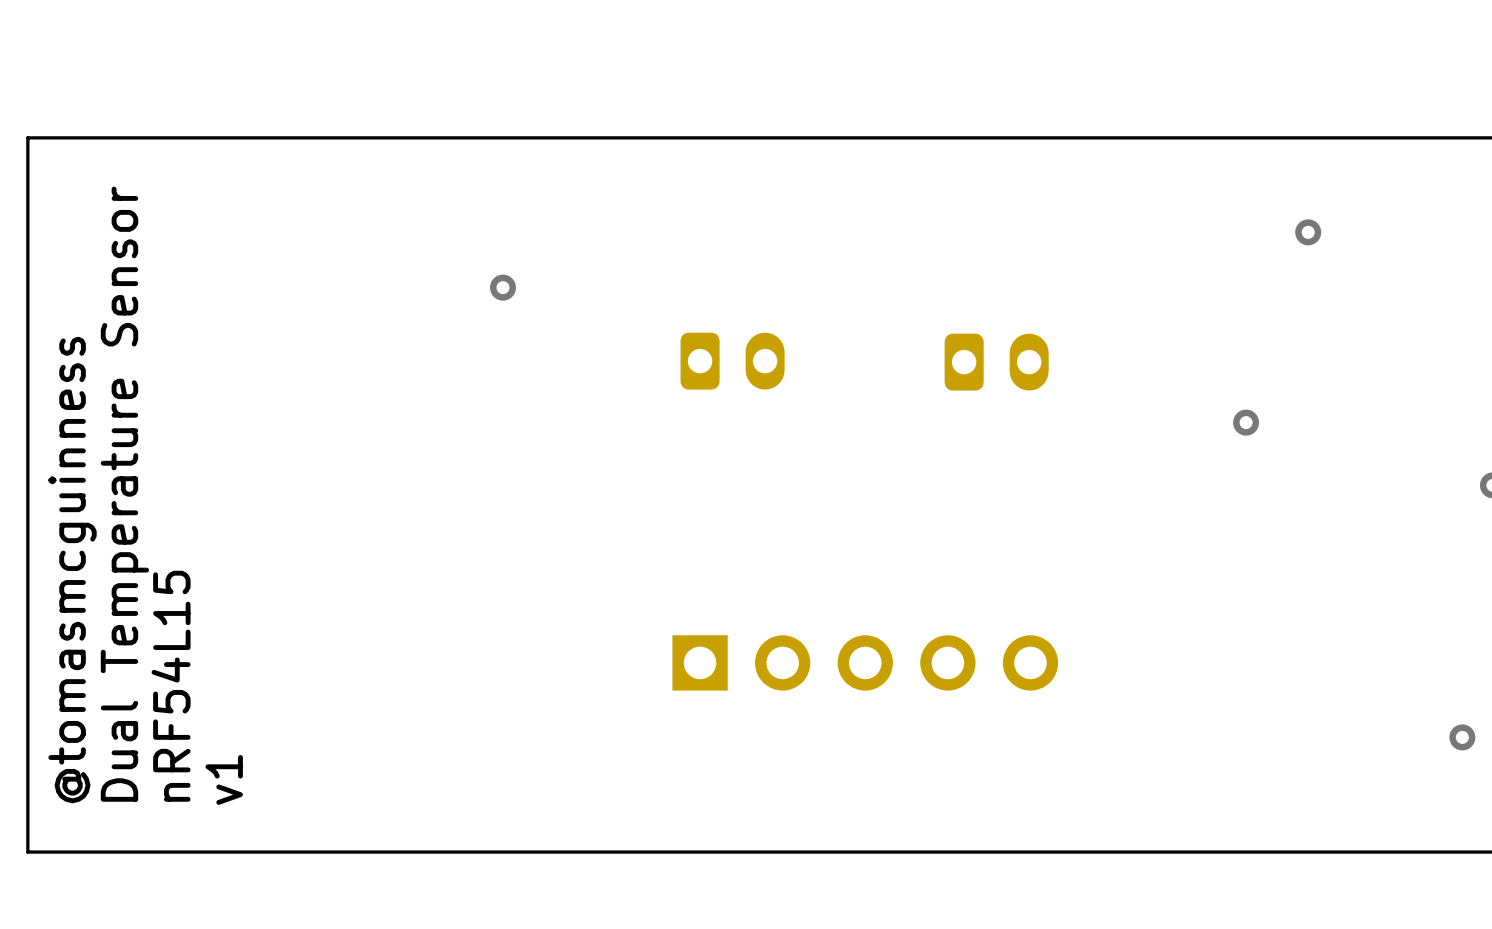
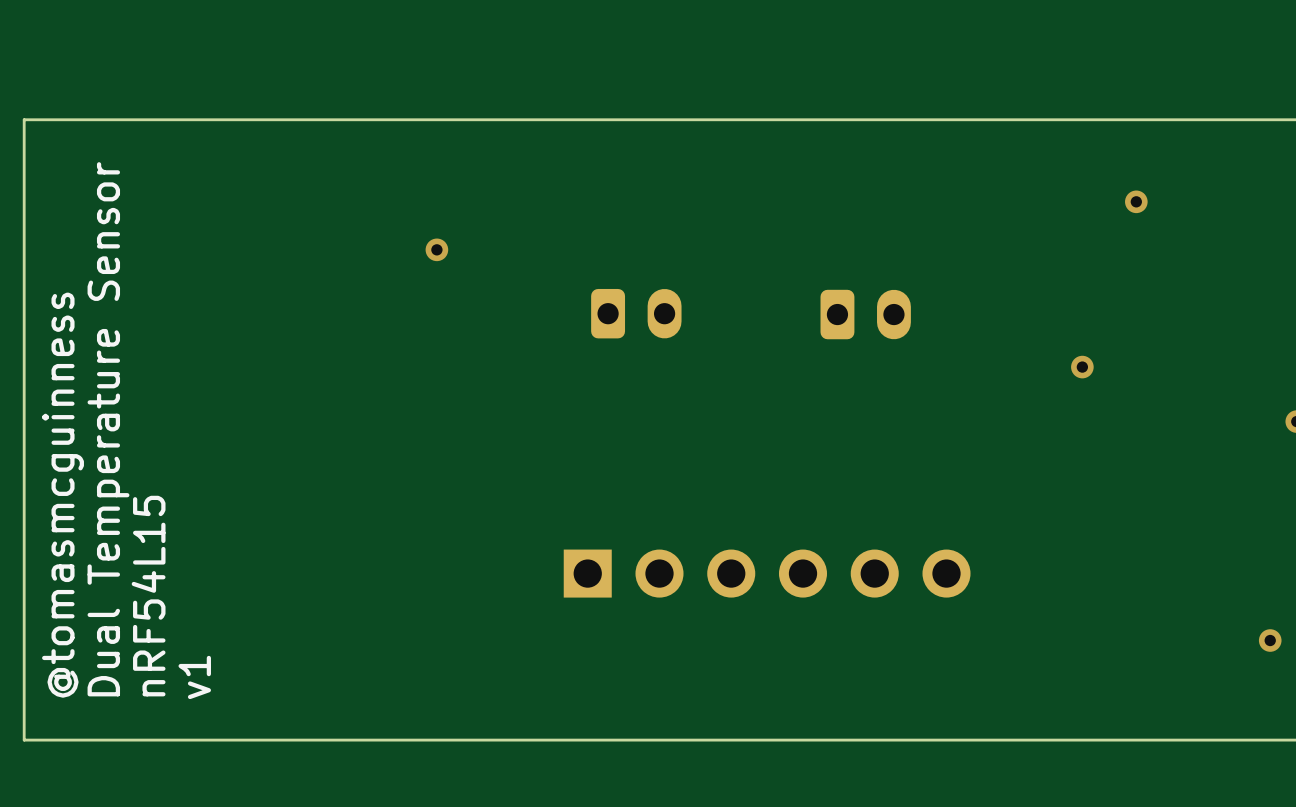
part footprint: [672, 635, 1059, 691] -> [563, 549, 971, 598]

